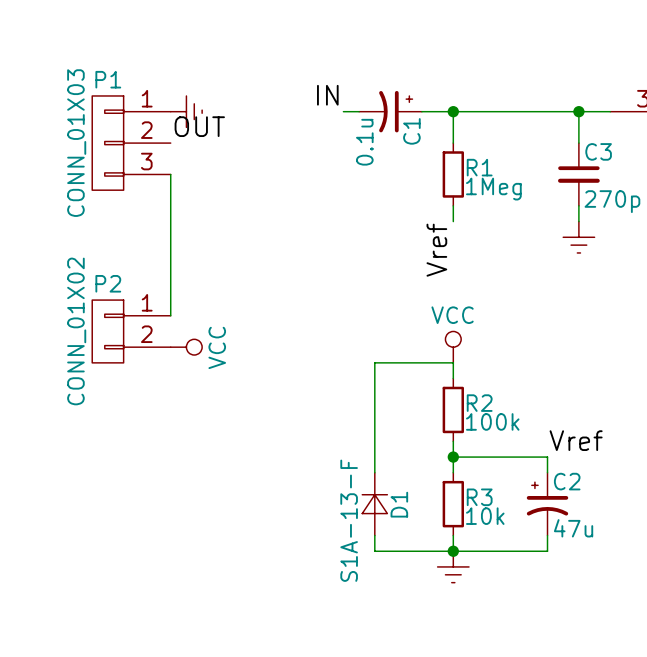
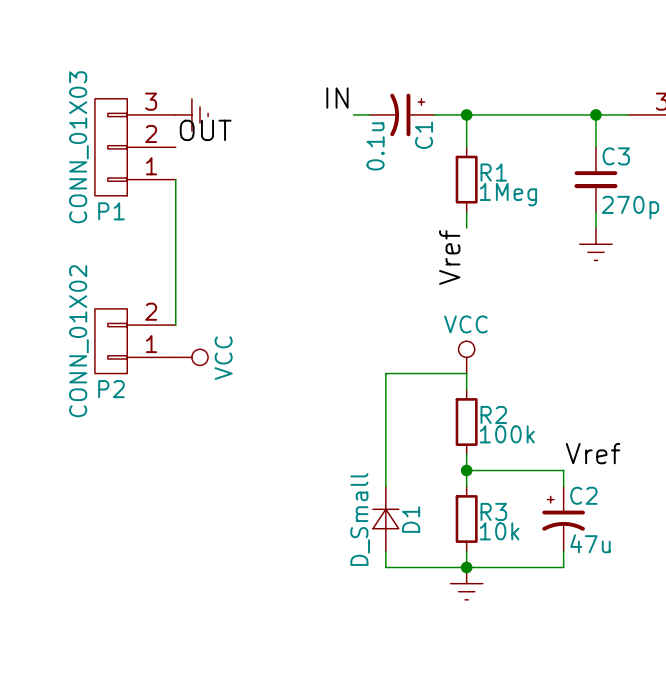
P1 flip: as is (107, 143) -> up-down (111, 147)
P2 flip: as is (107, 331) -> up-down (111, 341)
D1 value: S1A-13-F (349, 520) -> D_Small (360, 519)

